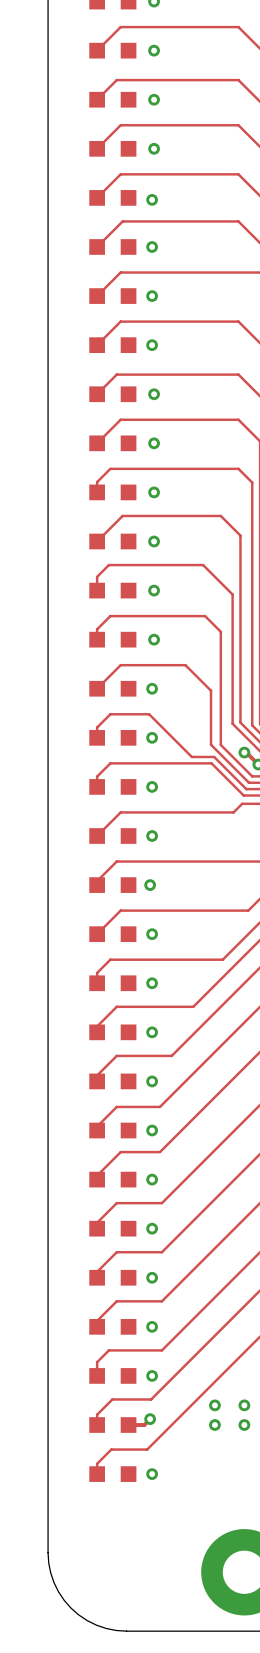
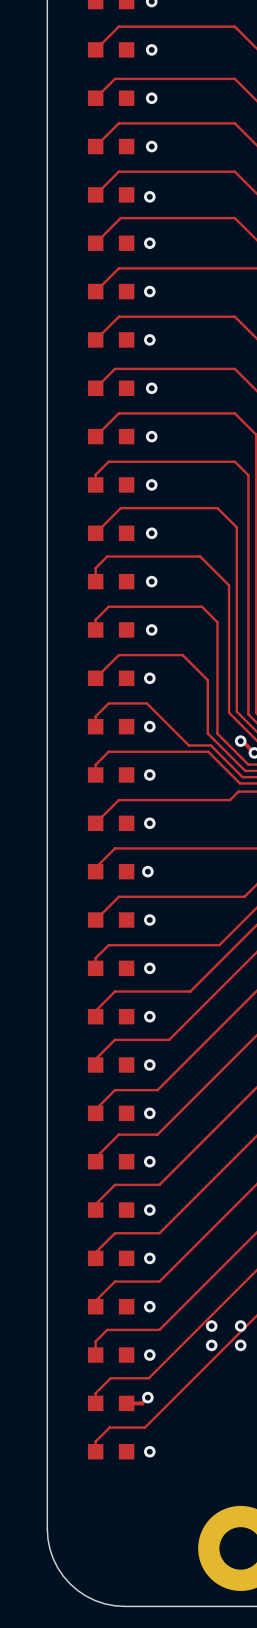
via: none -> (211, 1326)
via: none -> (240, 1326)
via: none -> (211, 1345)
via: none -> (240, 1345)
via: (214, 1405) -> none
via: (244, 1405) -> none
via: (214, 1425) -> none
via: (244, 1425) -> none

